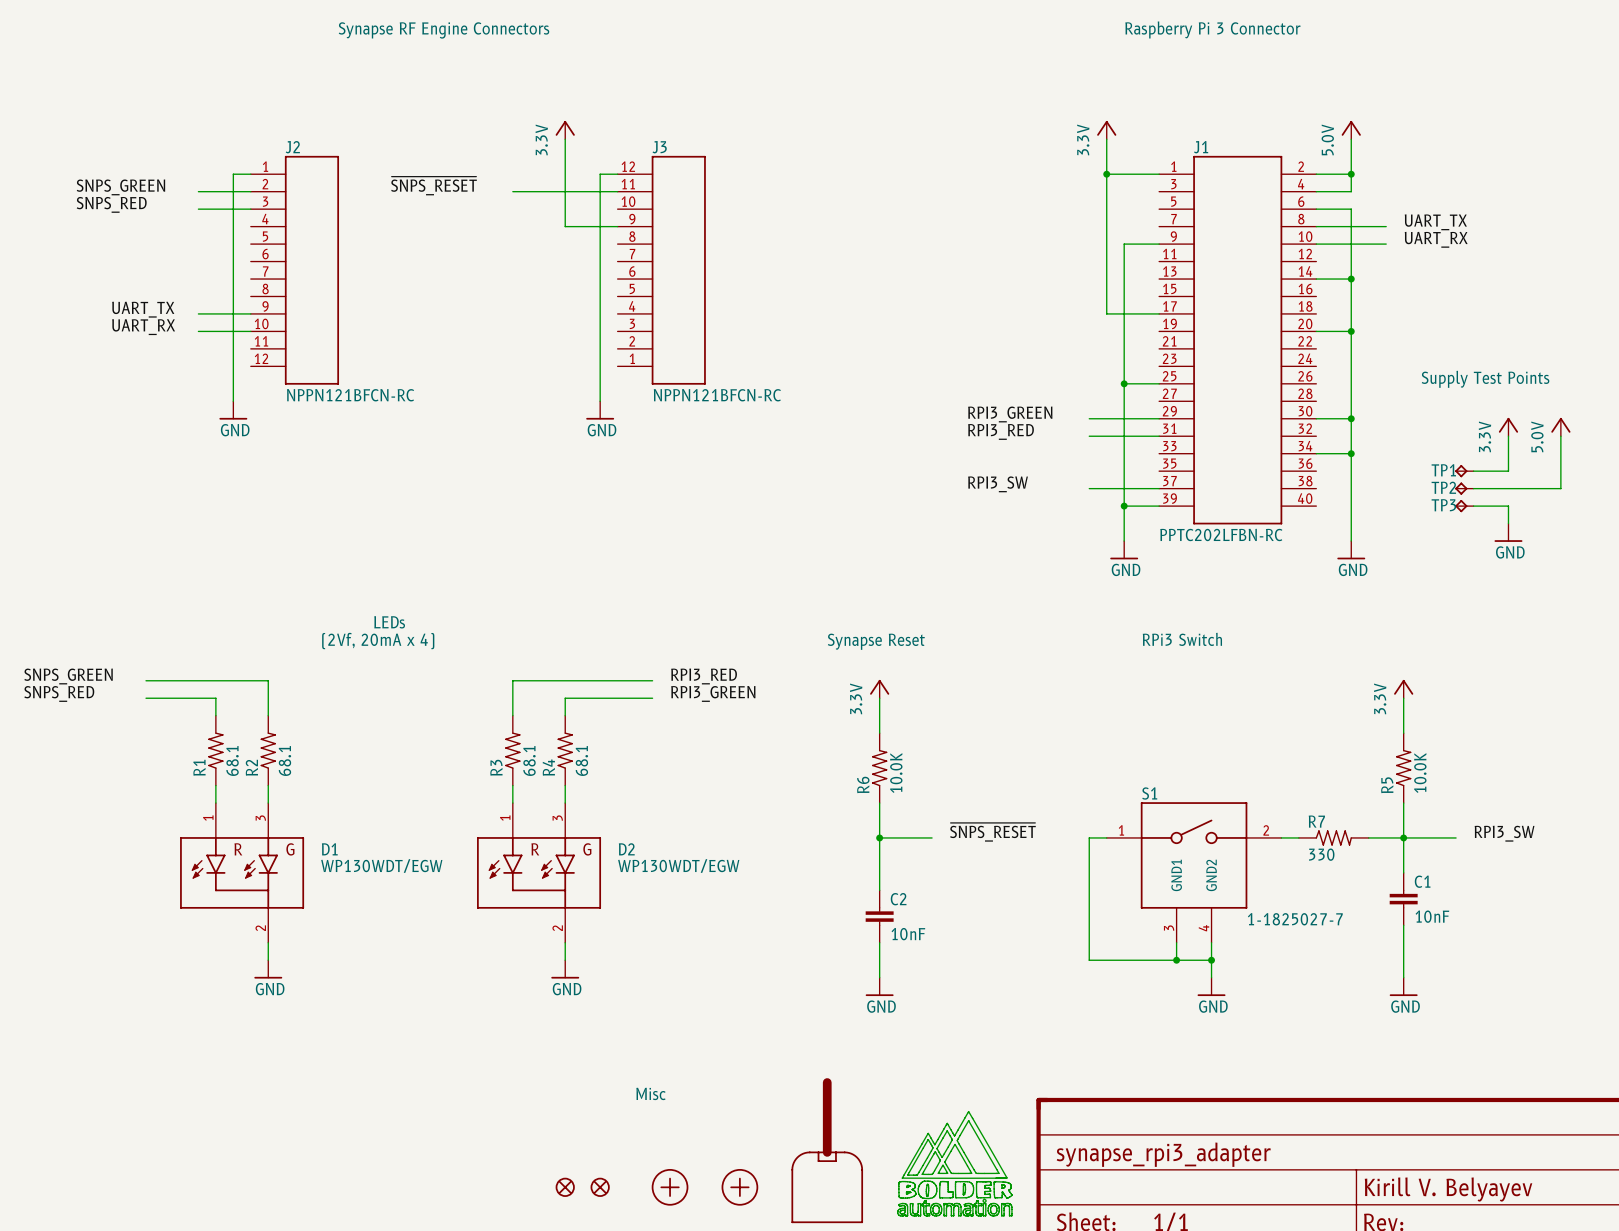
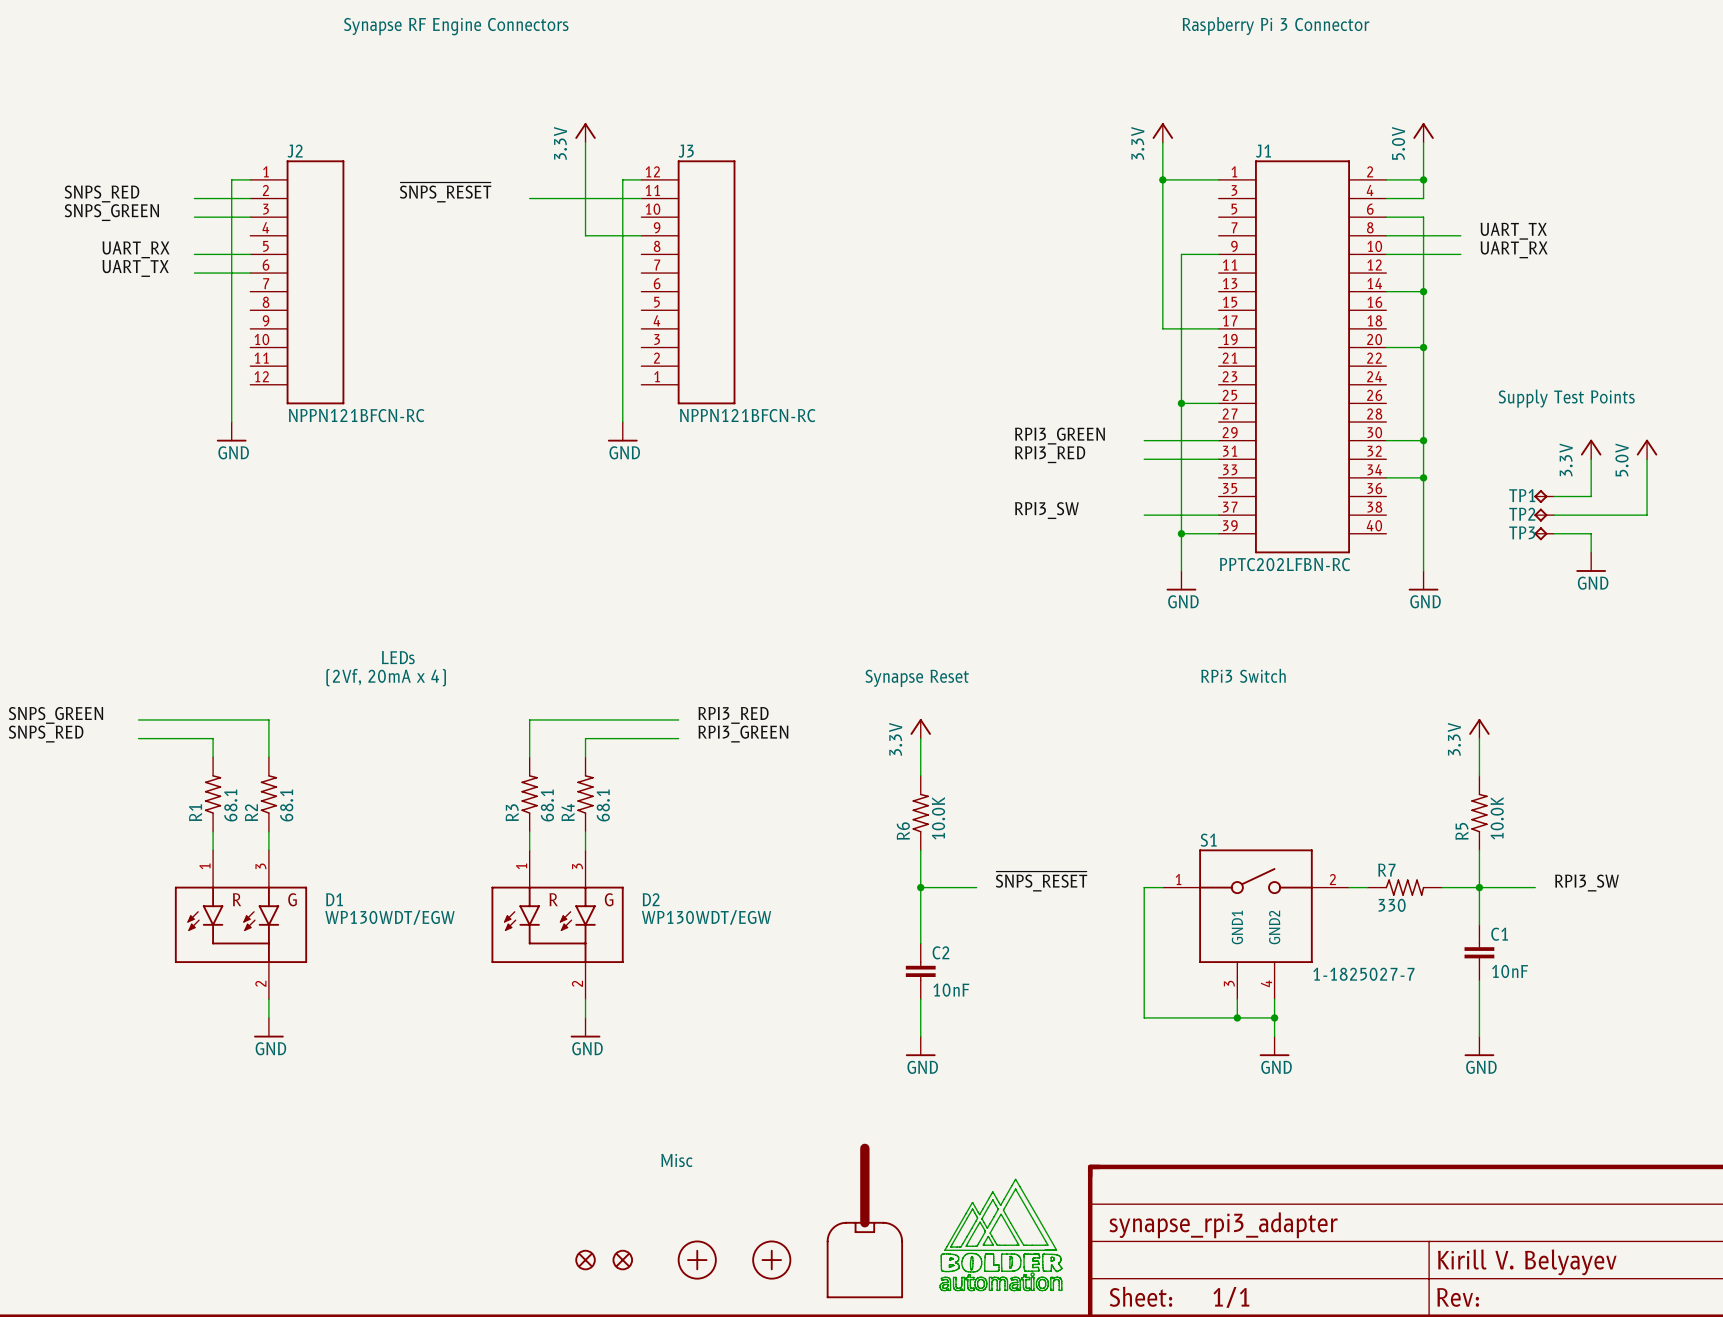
label: SNPS_GREEN (120, 187) -> SNPS_RED (101, 193)
label: SNPS_RED (111, 204) -> SNPS_GREEN (111, 212)
label position: UART_TX (143, 309) -> UART_TX (135, 268)
wire: (198, 313) (250, 313) -> (194, 273) (250, 273)
label position: UART_RX (143, 327) -> UART_RX (136, 249)
wire: (198, 331) (250, 331) -> (194, 254) (250, 254)

